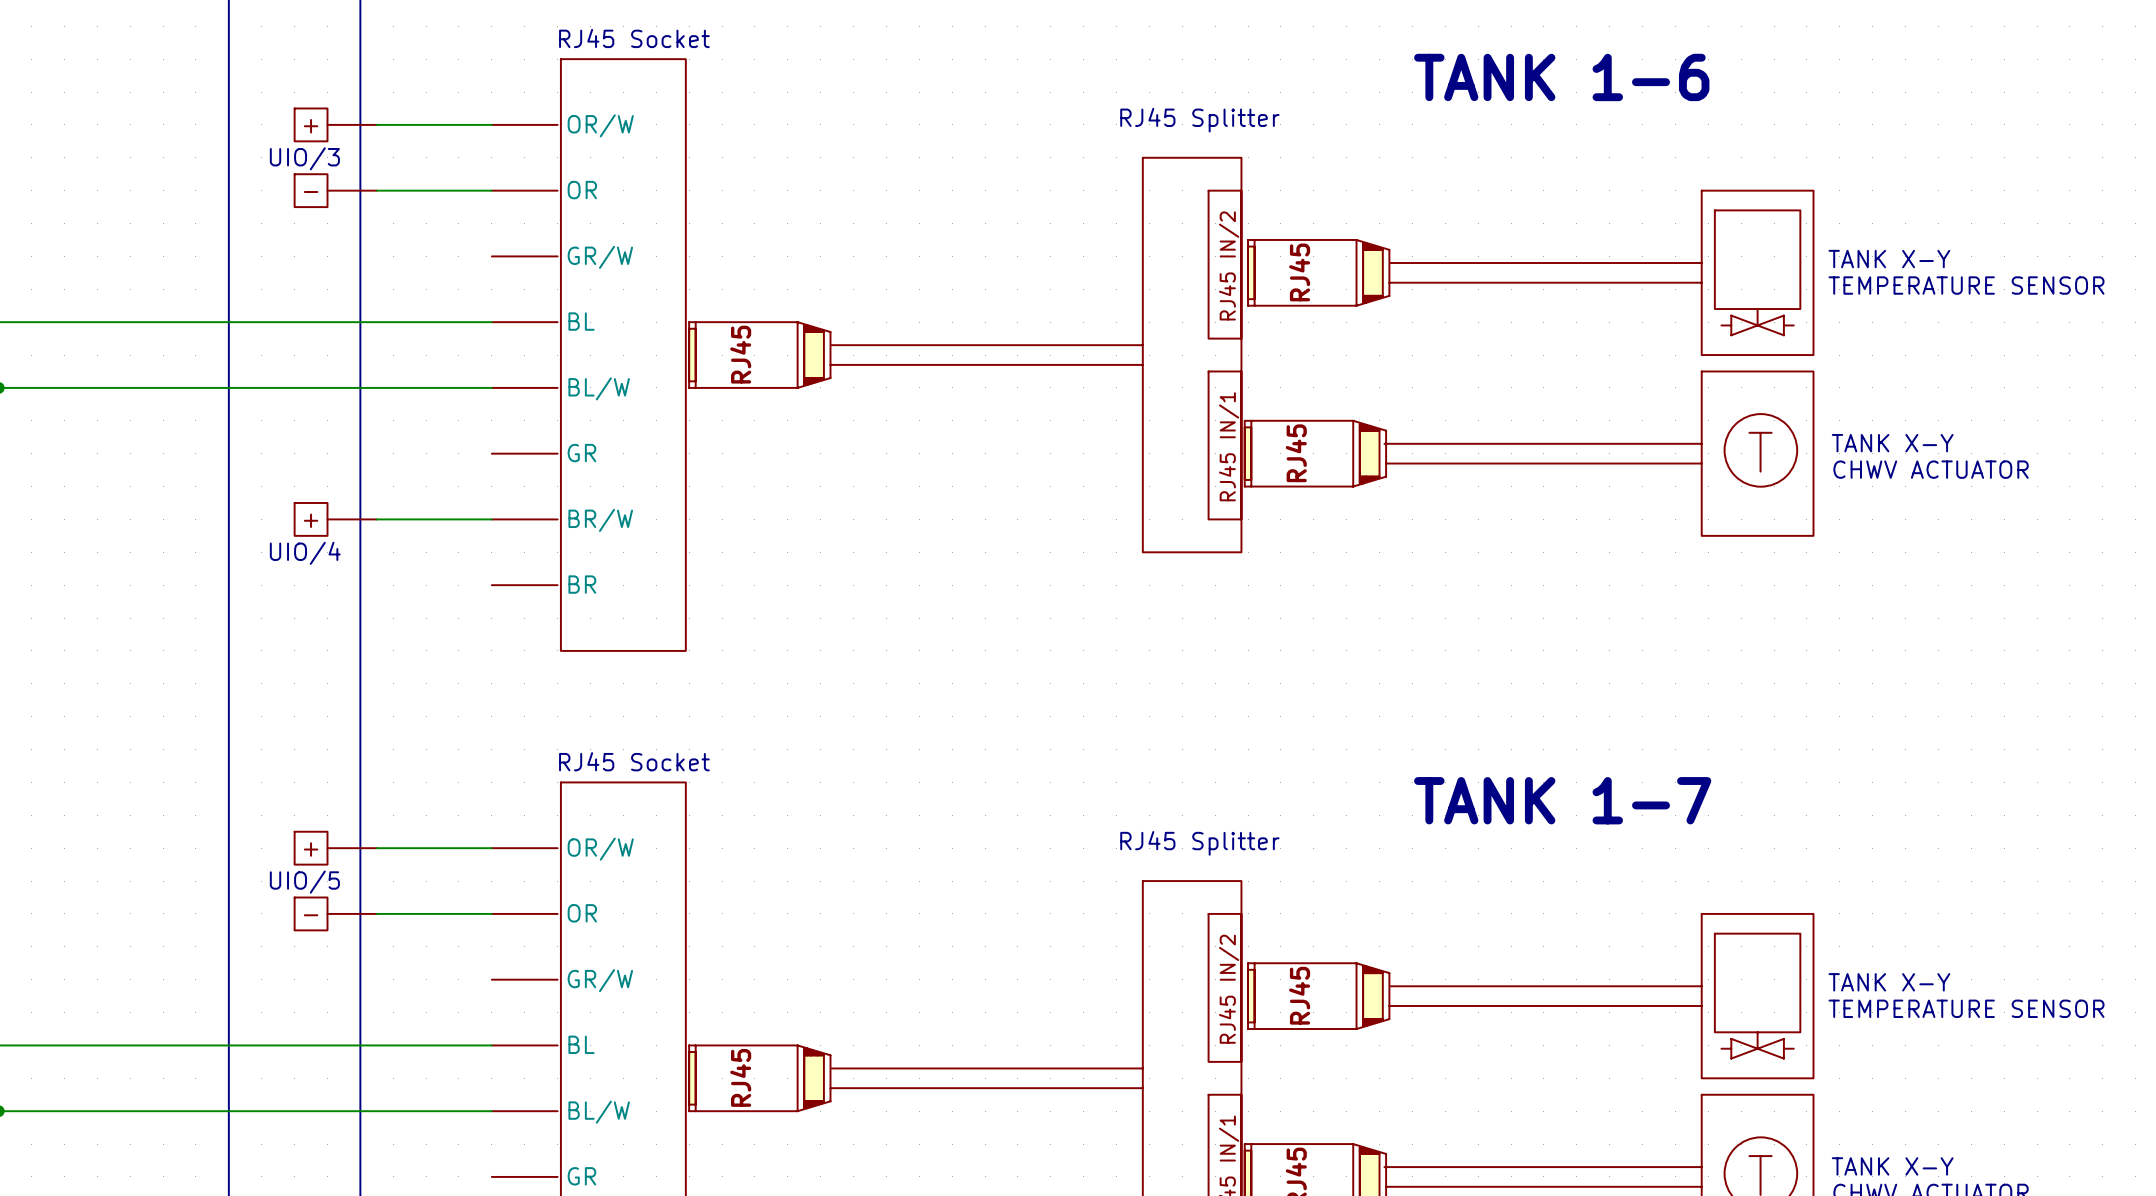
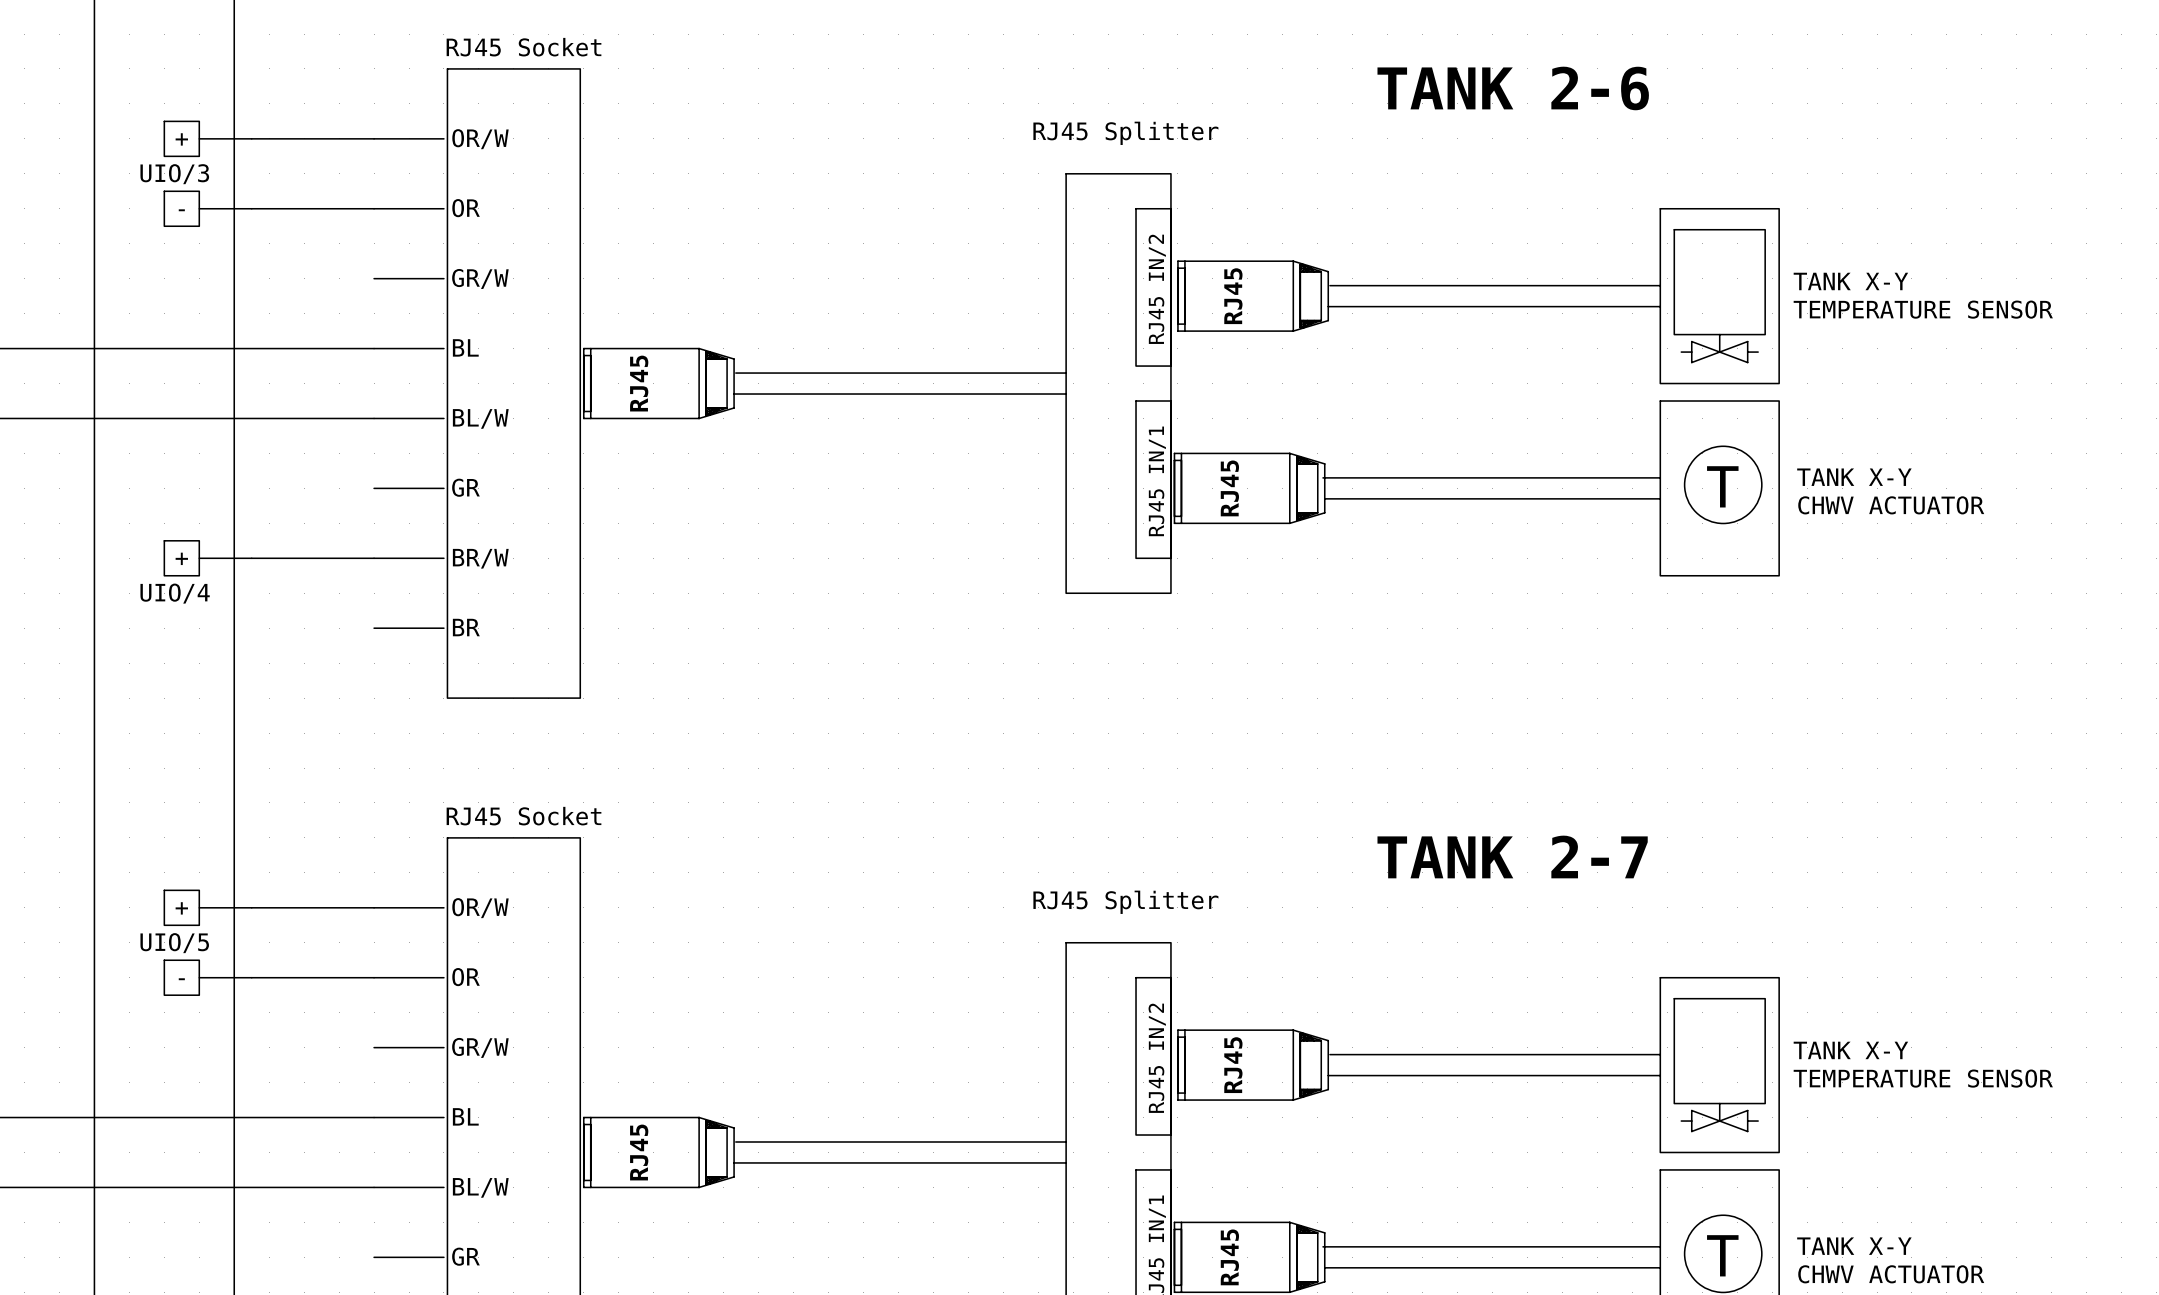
text: TANK 1-6 (1561, 77) -> TANK 2-6 (1513, 88)
text: TANK 1-7 (1562, 800) -> TANK 2-7 (1512, 856)

